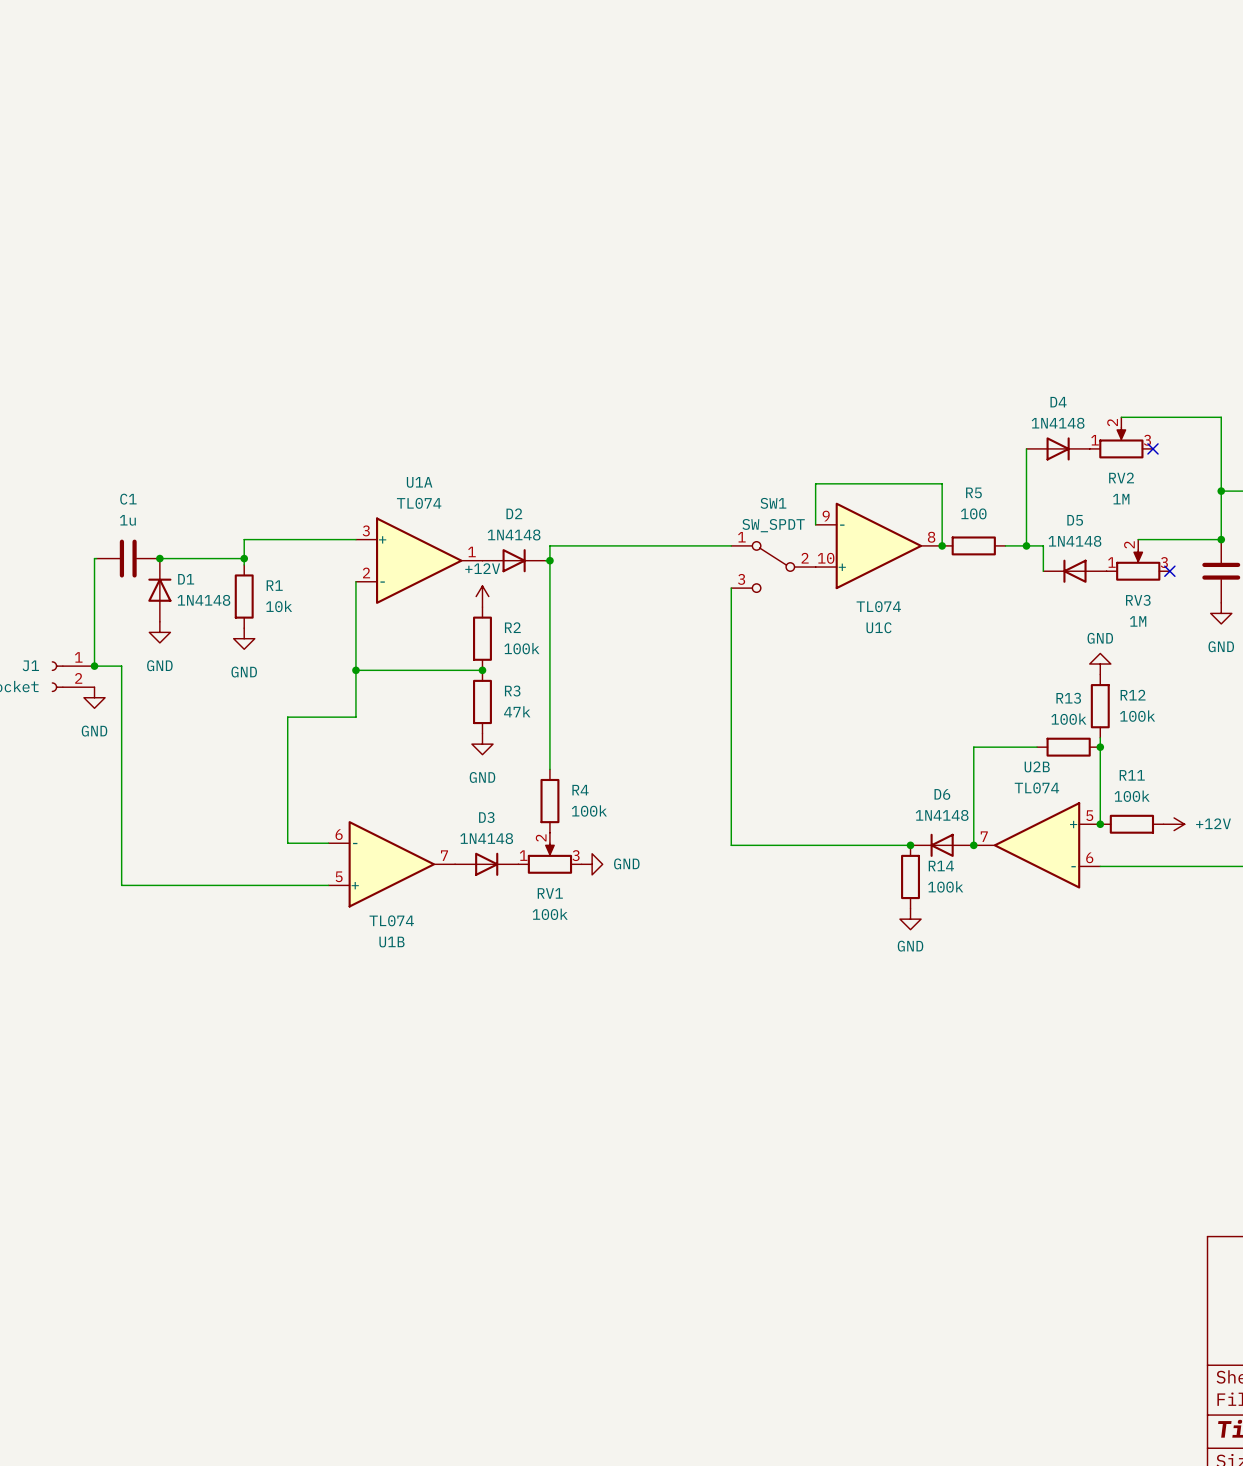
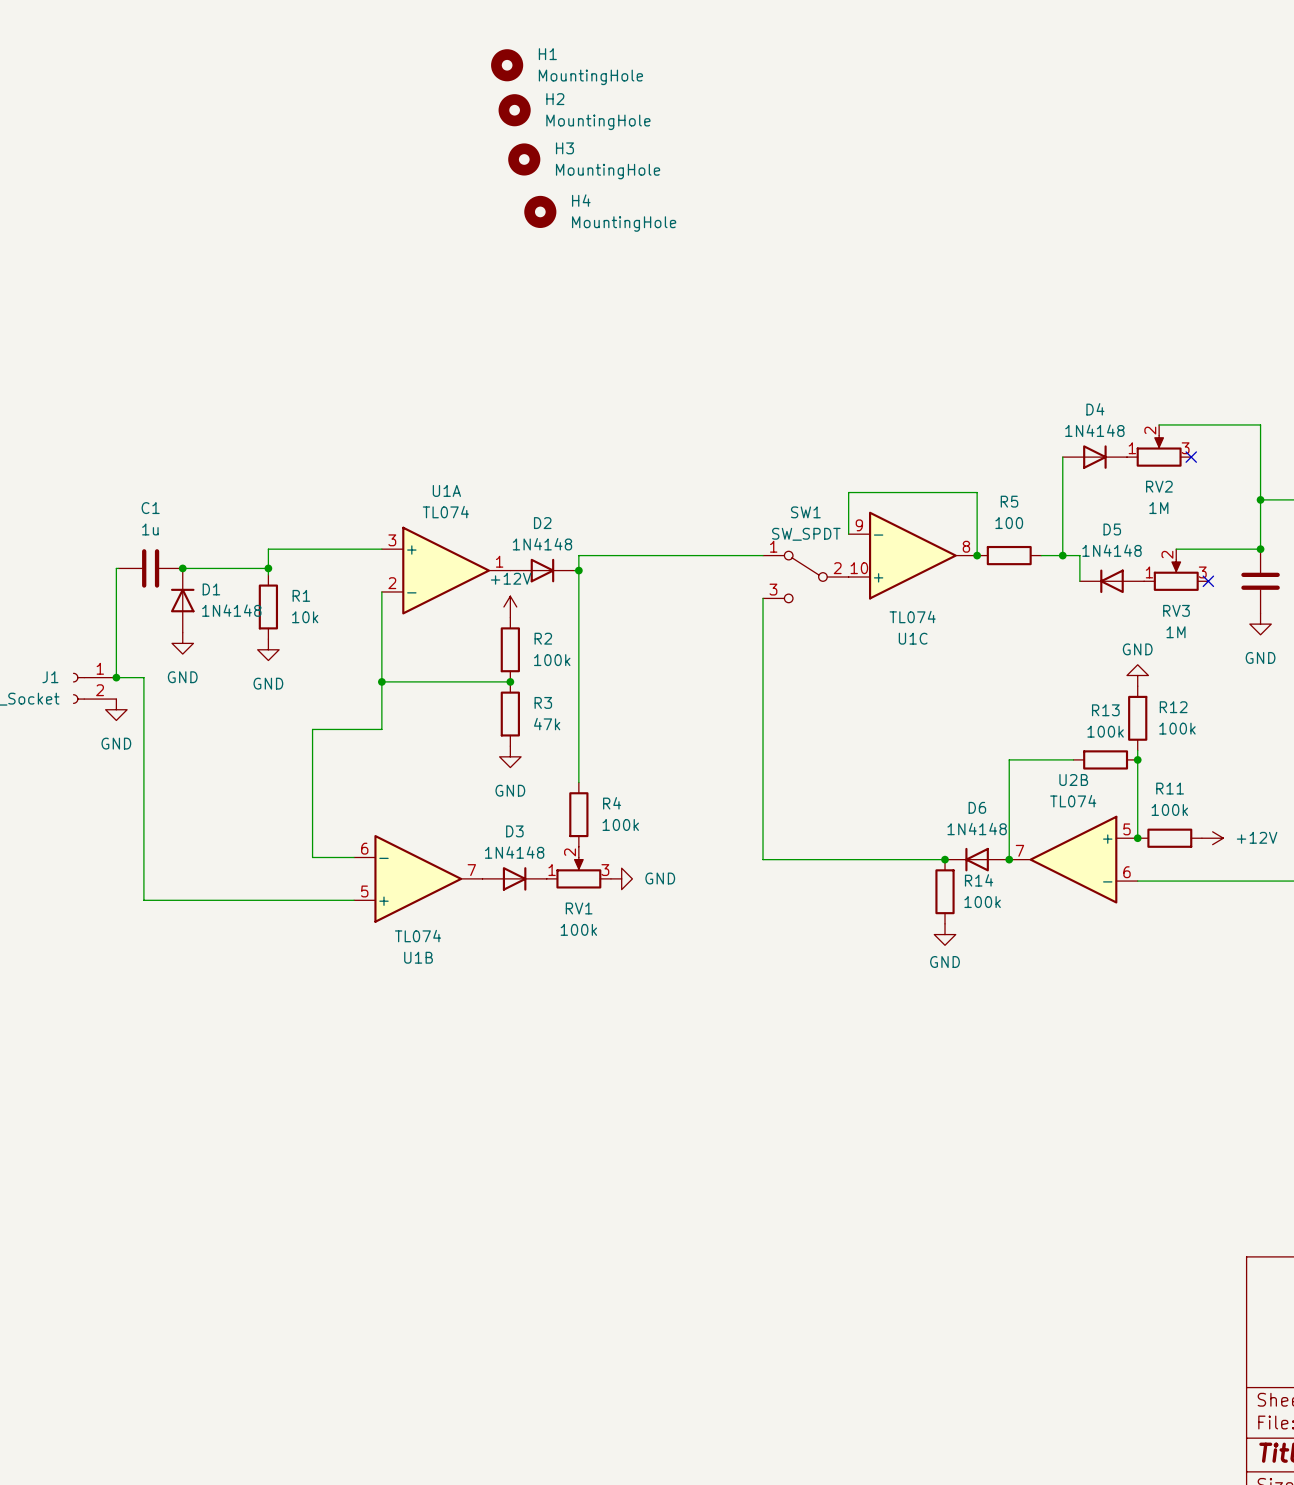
H1: none -> MountingHole (507, 65)
H2: none -> MountingHole (514, 110)
H3: none -> MountingHole (524, 159)
H4: none -> MountingHole (540, 211)

